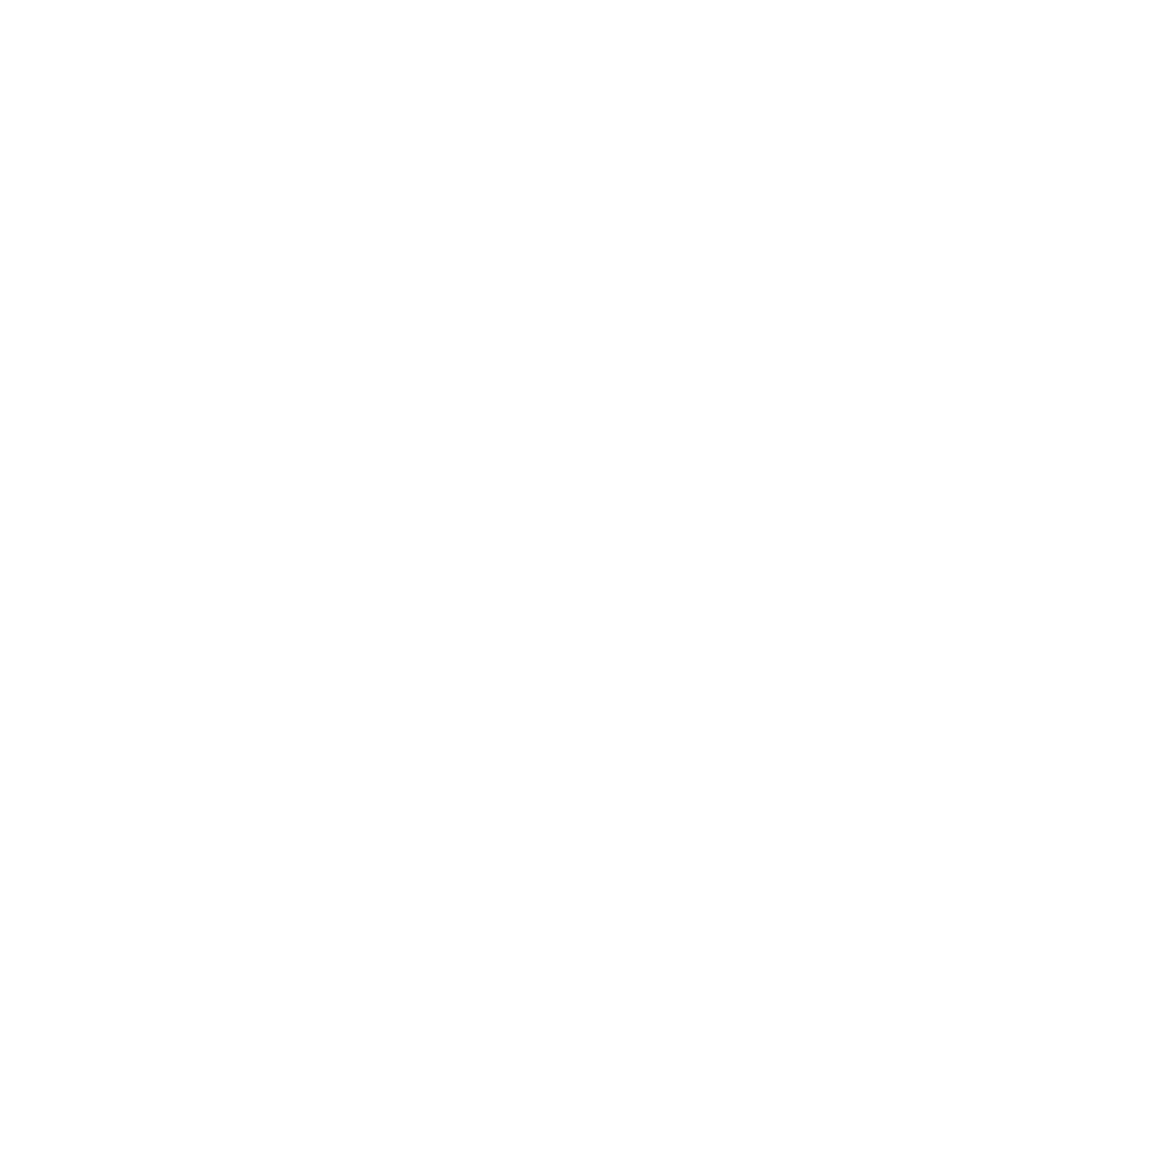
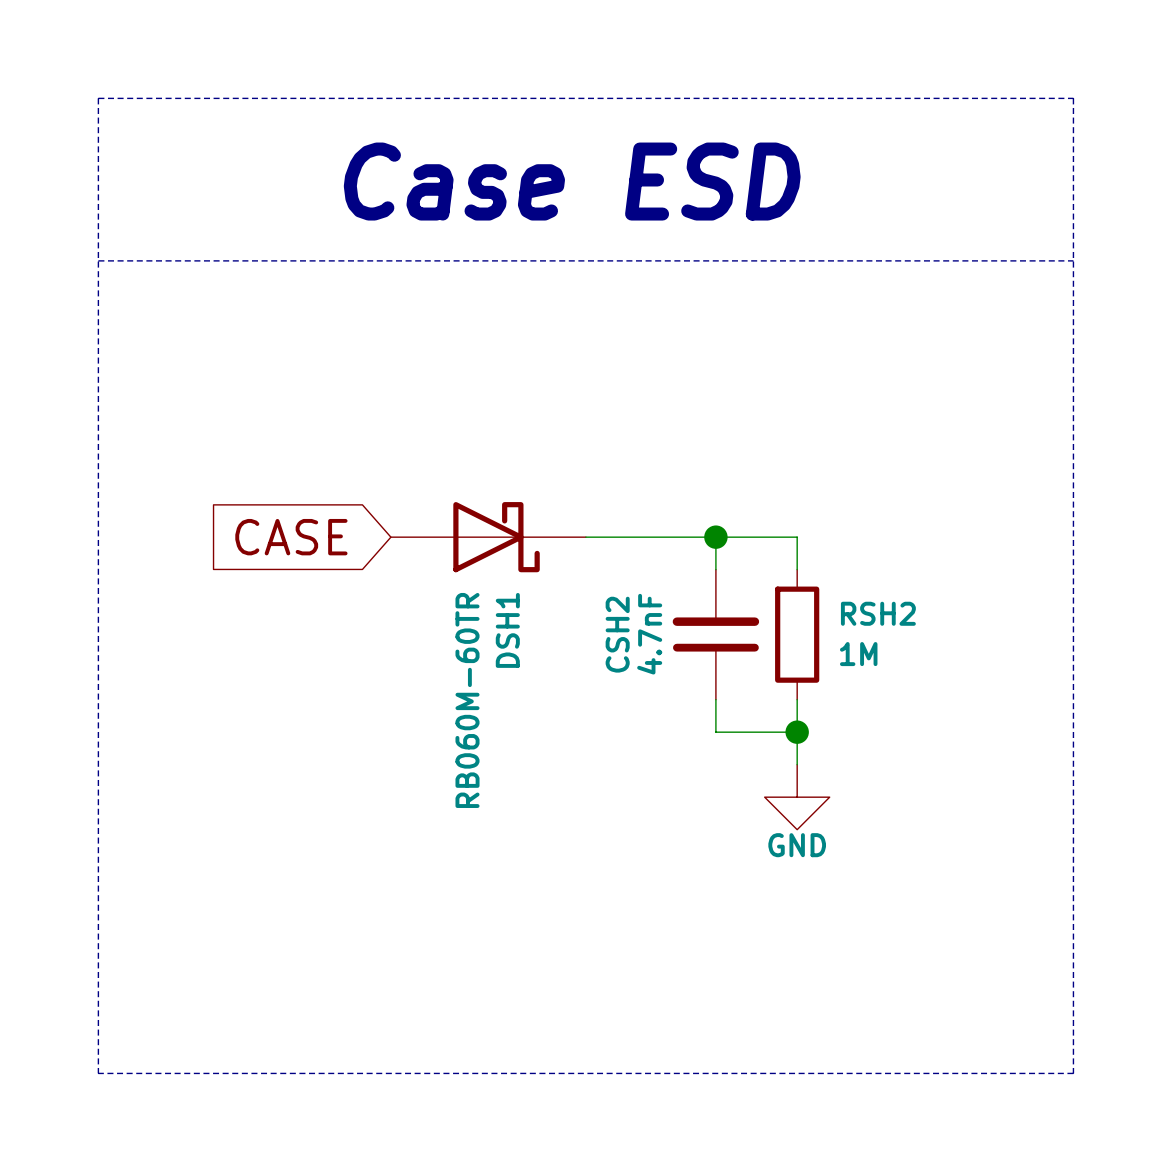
line: none -> (98, 98) (1073, 98) (1073, 1073) (98, 1073) (98, 98)
text: none -> Case ESD (572, 181)
line: none -> (98, 260) (1073, 260)
global label: none -> CASE (291, 537)
DSH1: none -> RB060M-60TR (488, 537)
wire: none -> (585, 537) (797, 537) (797, 569)
wire: none -> (715, 537) (715, 569)
junction: none -> (715, 537)
CSH2: none -> 4.7nF (715, 634)
RSH2: none -> 1M (797, 634)
wire: none -> (715, 699) (715, 732) (797, 732)
wire: none -> (797, 699) (797, 764)
junction: none -> (797, 732)
power symbol: none -> GND (797, 797)

